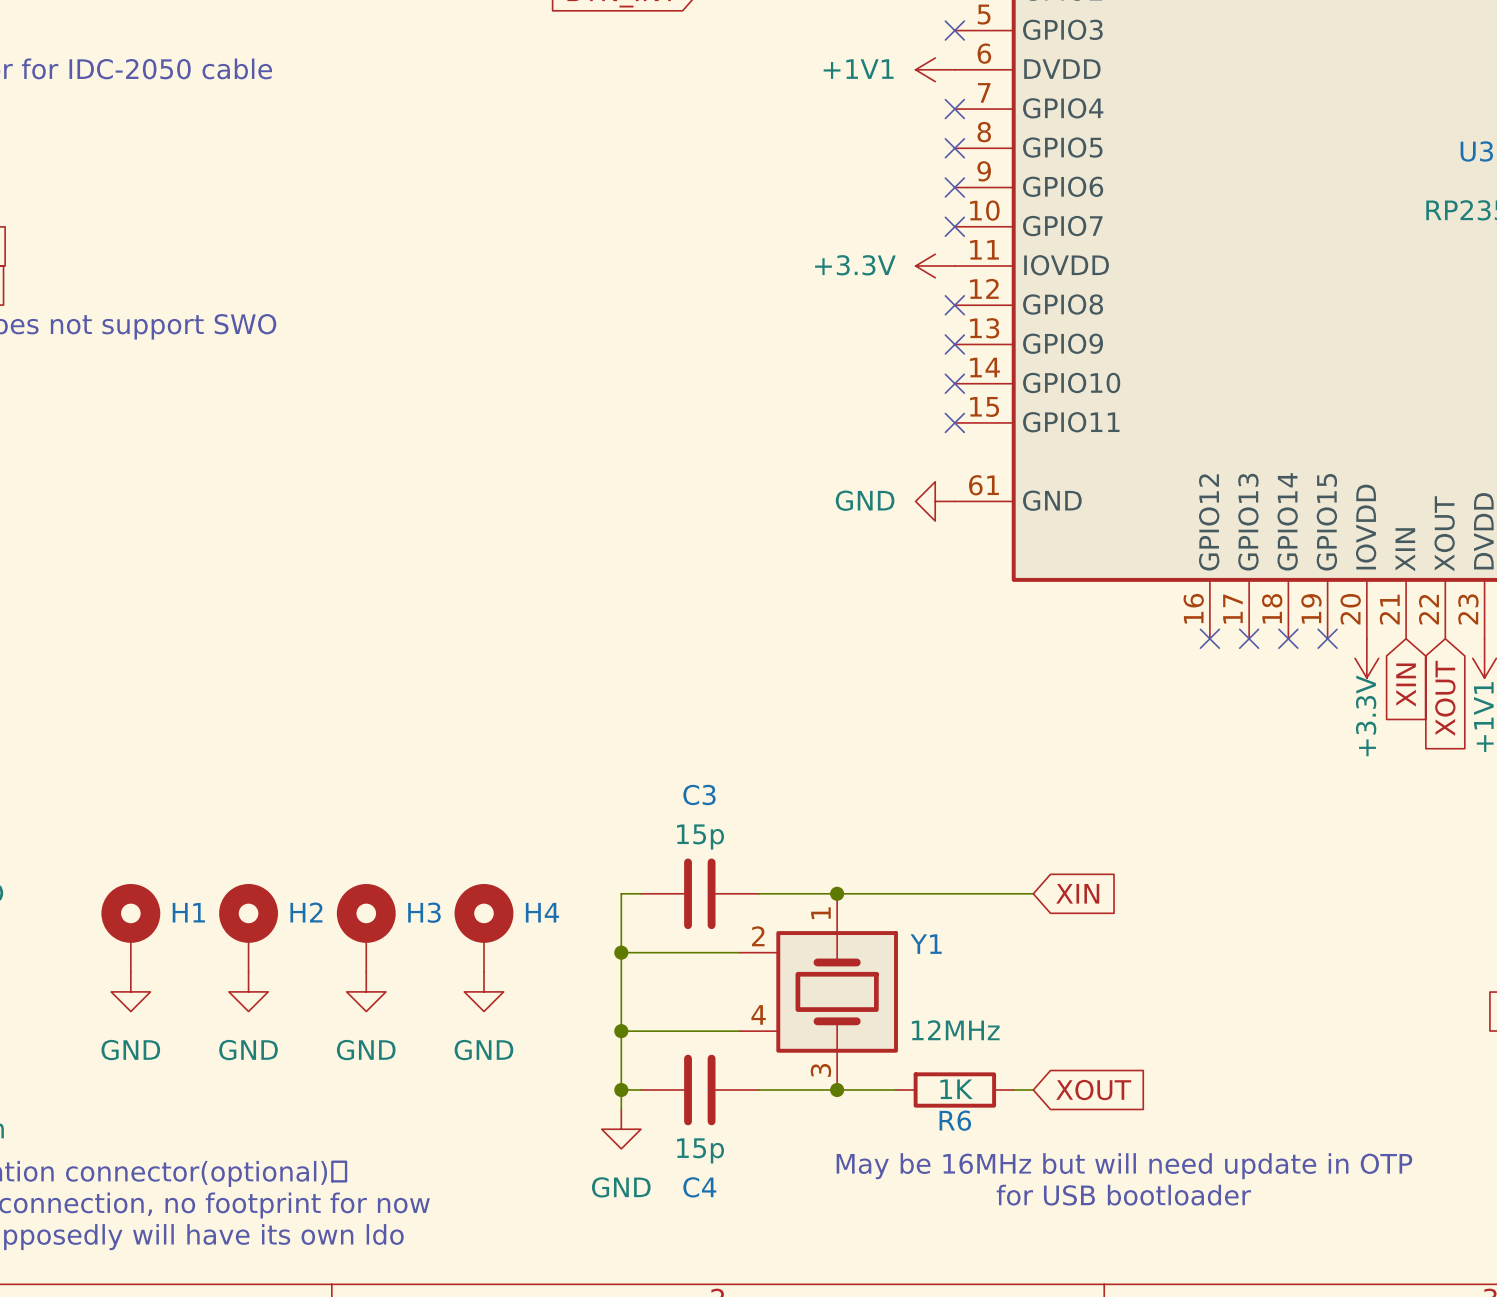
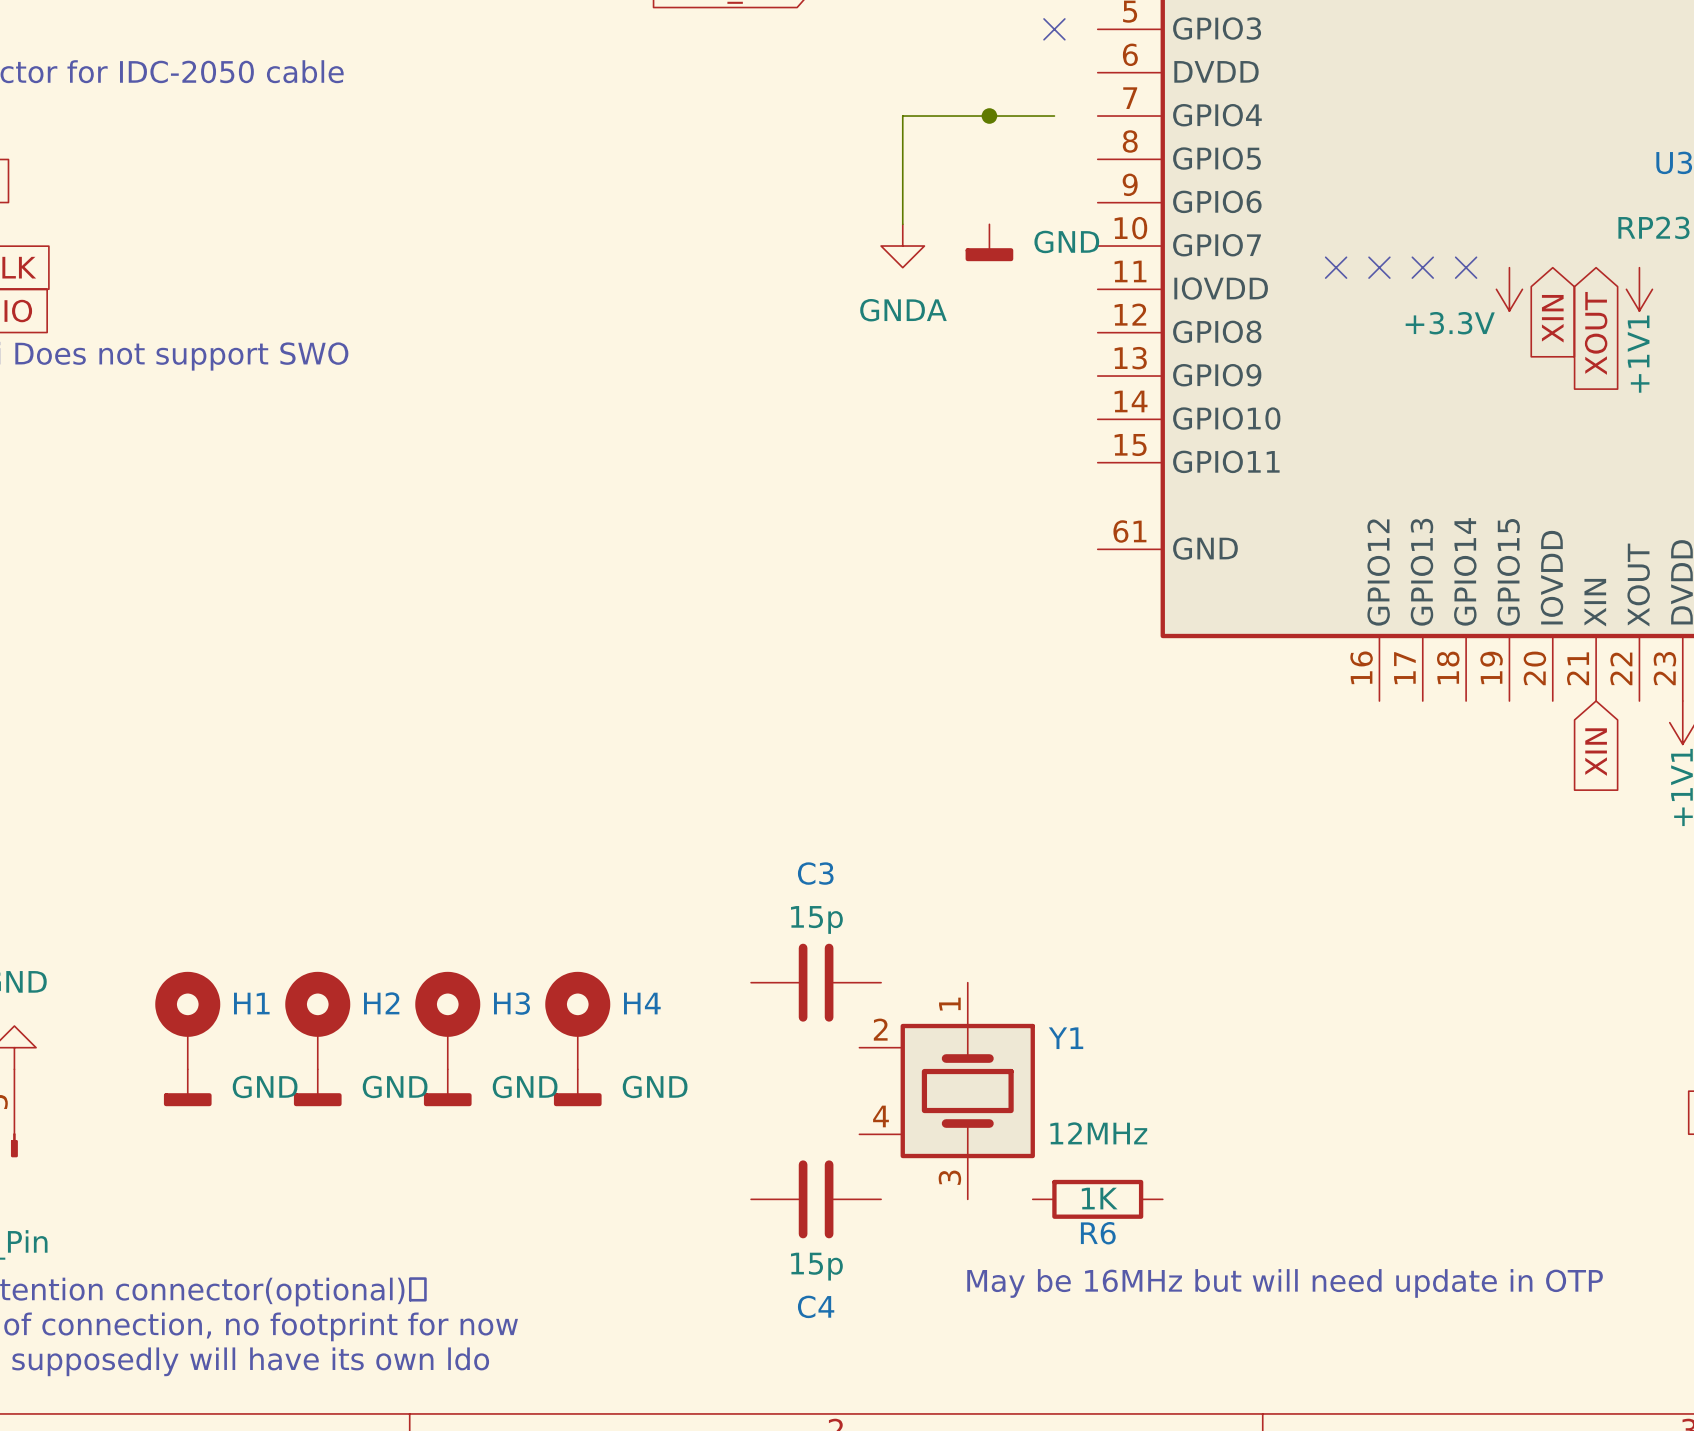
no-connect mark position: (954, 30) -> (1054, 29)
power symbol: +1V1 (935, 69) -> none
junction: none -> (989, 116)
wire: none -> (1054, 116) (902, 116) (902, 224)
no-connect mark: (954, 109) -> none
no-connect mark: (954, 148) -> none
no-connect mark: (954, 187) -> none
power symbol: none -> GND (989, 242)
power symbol: none -> GNDA (902, 246)
no-connect mark: (954, 226) -> none
no-connect mark: none -> (1336, 267)
no-connect mark: none -> (1379, 267)
no-connect mark: none -> (1422, 267)
no-connect mark: none -> (1466, 267)
power symbol: +3.3V (935, 266) -> none
power symbol: none -> +3.3V (1509, 289)
power symbol: none -> +1V1 (1639, 289)
global label: none -> XIN (1552, 318)
no-connect mark: (954, 305) -> none
global label: none -> XOUT (1596, 333)
no-connect mark: (954, 344) -> none
no-connect mark: (954, 383) -> none
no-connect mark: (954, 422) -> none
power symbol: GND (935, 501) -> none
no-connect mark: (1209, 638) -> none
no-connect mark: (1249, 638) -> none
no-connect mark: (1288, 638) -> none
no-connect mark: (1327, 638) -> none
power symbol: +3.3V (1366, 658) -> none
global label: XOUT (1445, 698) -> none
wire: (640, 893) (621, 893) (621, 1109) -> none
wire: (758, 893) (1033, 893) -> none
junction: (837, 893) -> none
global label: XIN (1077, 893) -> none
wire: (621, 952) (739, 952) -> none
junction: (621, 952) -> none
power symbol shape: [111, 972, 151, 1012] -> [163, 1069, 212, 1107]
power symbol shape: [228, 972, 269, 1012] -> [293, 1069, 342, 1107]
power symbol shape: [346, 972, 386, 1012] -> [423, 1069, 472, 1107]
power symbol shape: [464, 972, 504, 1012] -> [553, 1069, 602, 1107]
wire: (621, 1031) (739, 1031) -> none
junction: (621, 1031) -> none
power symbol text position: GND (130, 1050) -> GND (265, 1086)
power symbol text position: GND (248, 1050) -> GND (395, 1086)
power symbol text position: GND (366, 1050) -> GND (525, 1086)
power symbol text position: GND (483, 1050) -> GND (655, 1086)
wire: (621, 1090) (640, 1090) -> none
junction: (621, 1090) -> none
wire: (758, 1090) (895, 1090) -> none
junction: (837, 1090) -> none
wire: (1013, 1090) (1033, 1090) -> none
global label: XOUT (1093, 1090) -> none
power symbol: GND (621, 1129) -> none
text: for USB bootloader (1123, 1195) -> none

